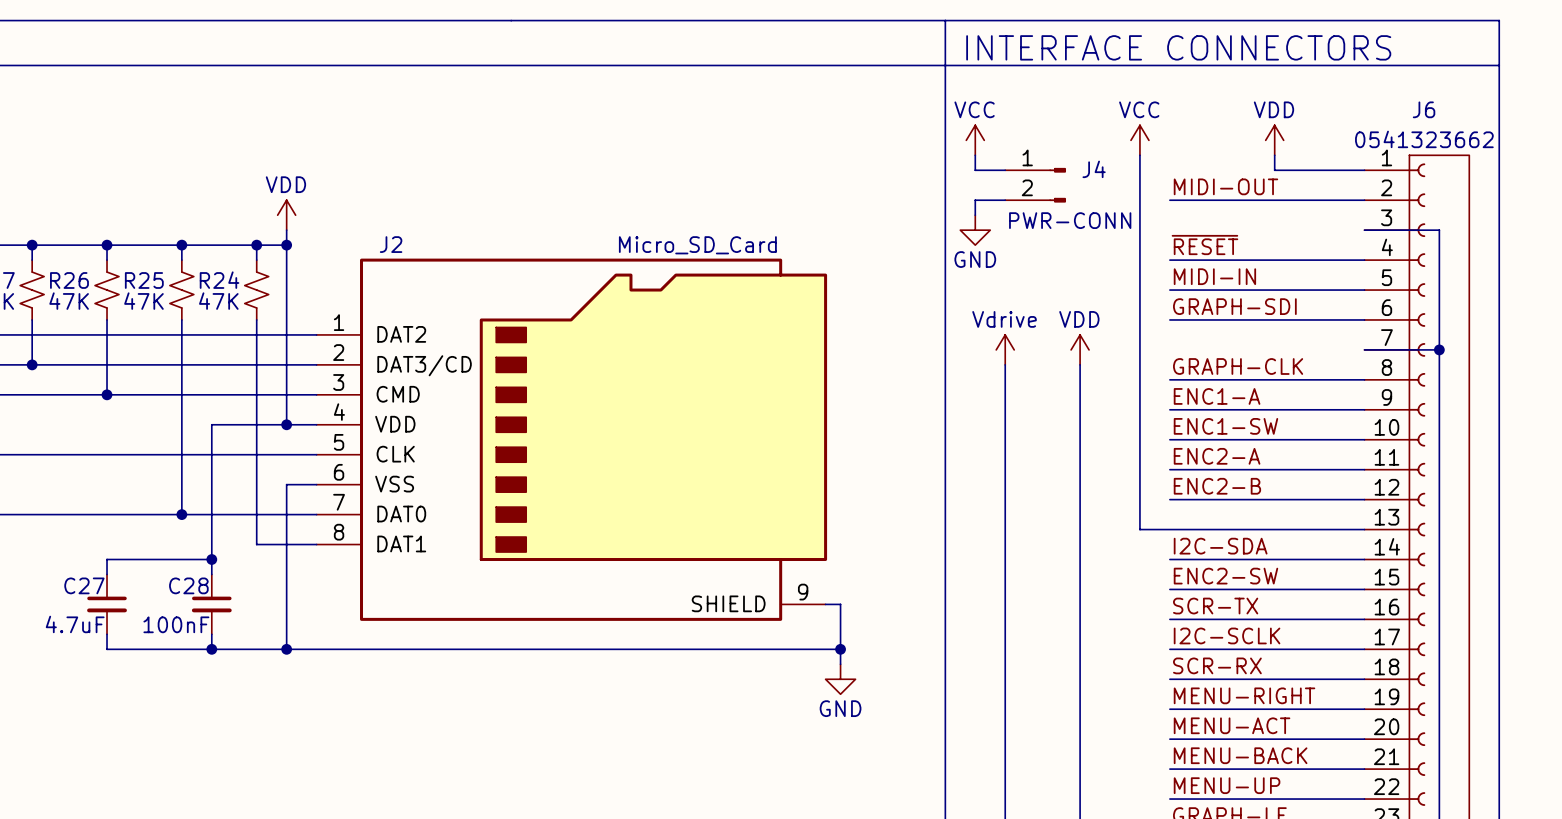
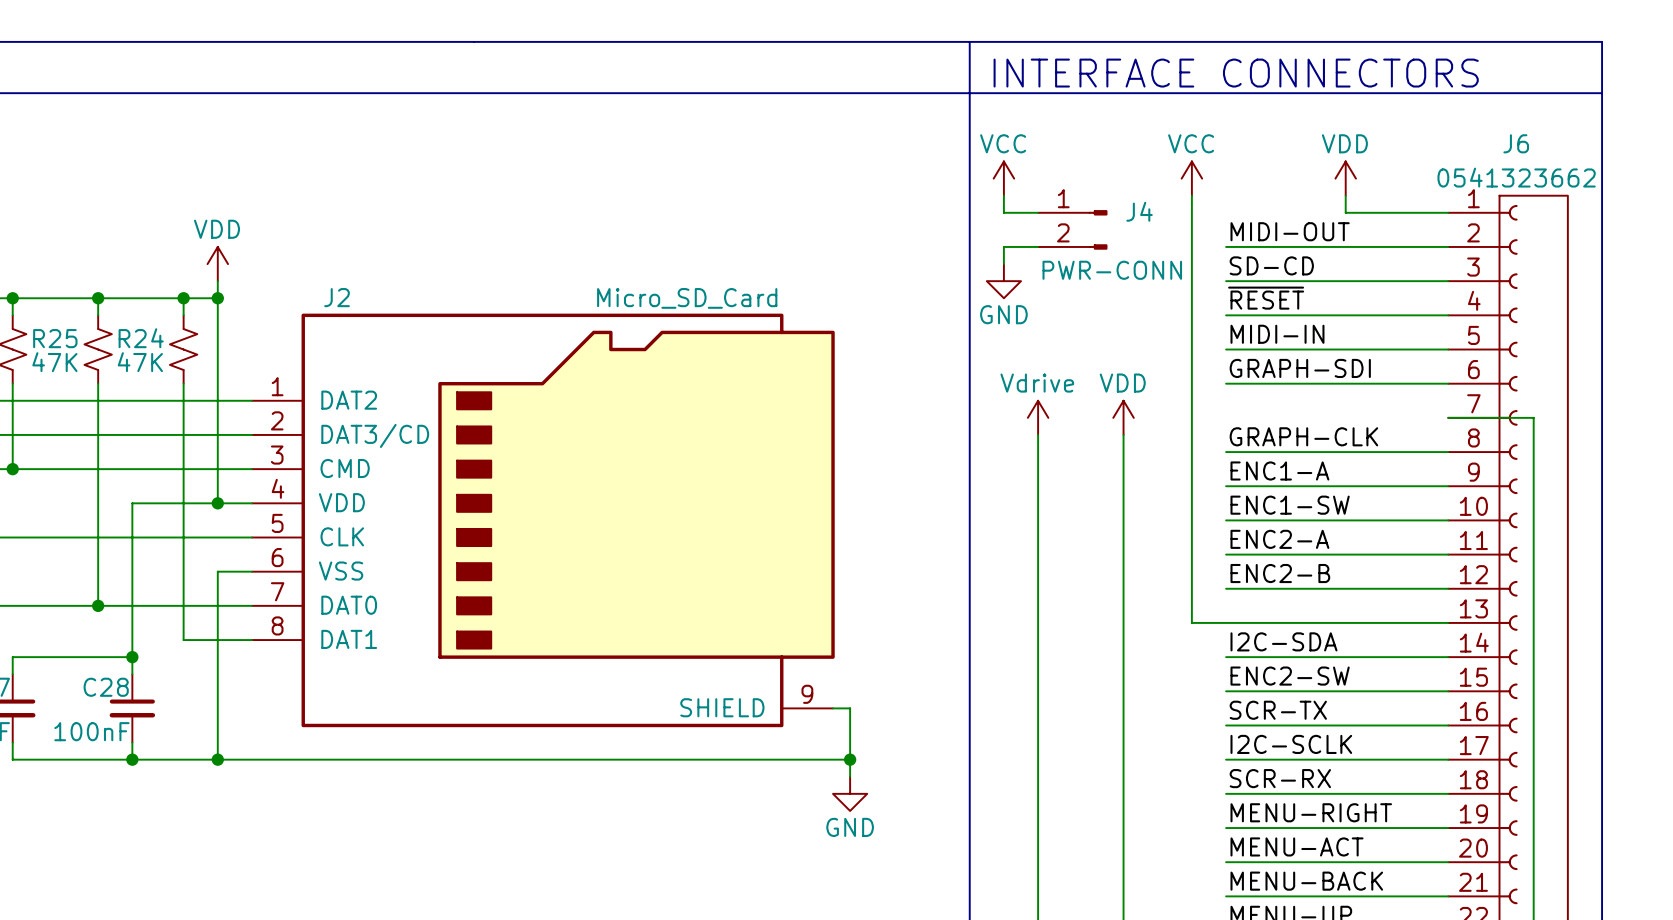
label: none -> SD-CD (1271, 265)
wire: (1364, 230) (1439, 230) (1439, 349) -> (1448, 281) (1226, 281)
junction: (1439, 349) -> none

